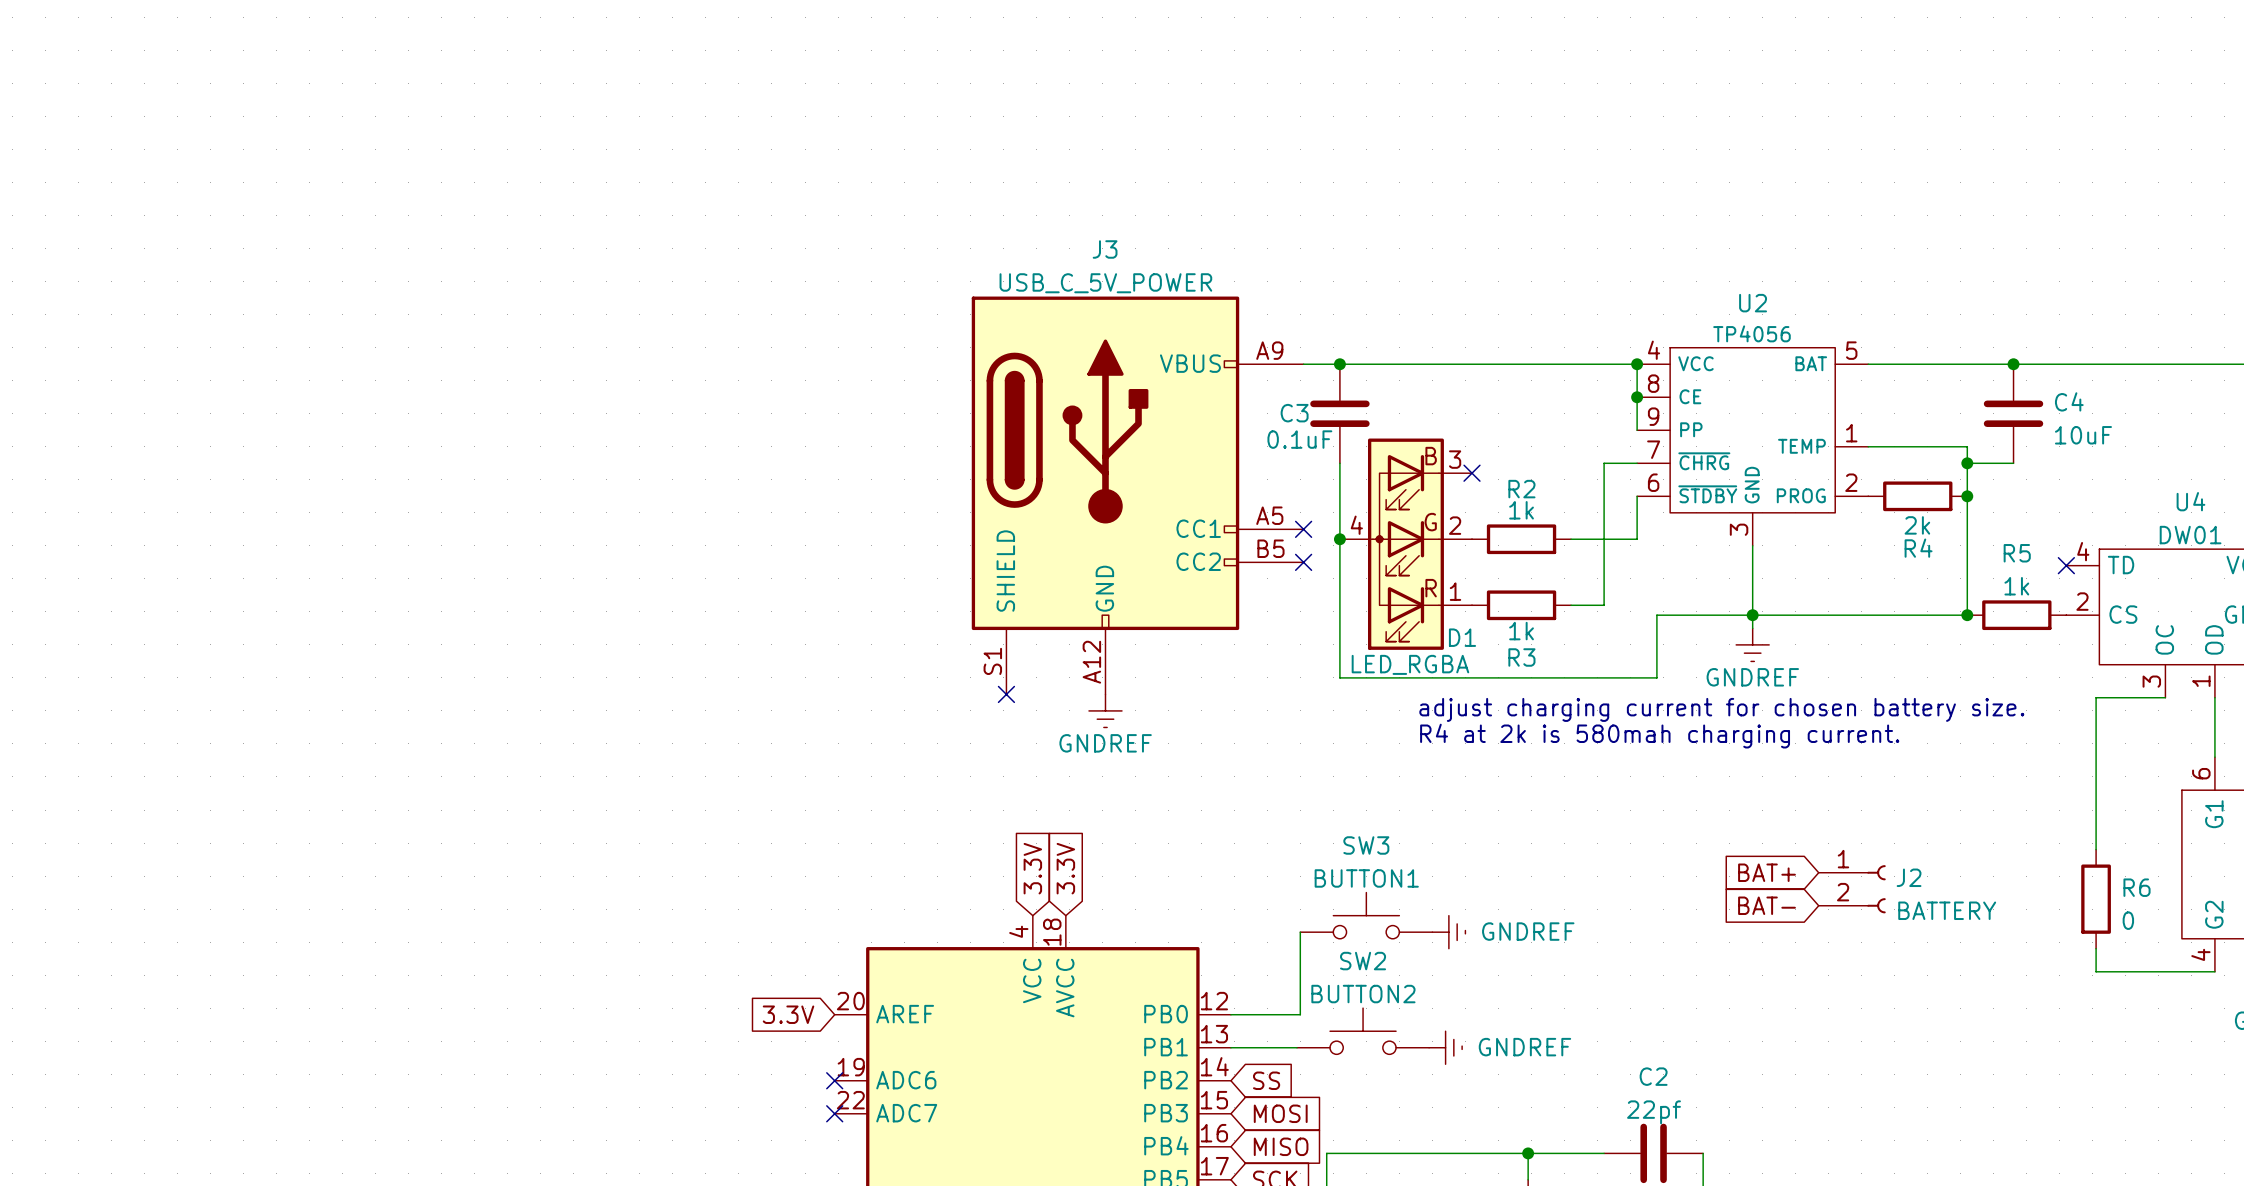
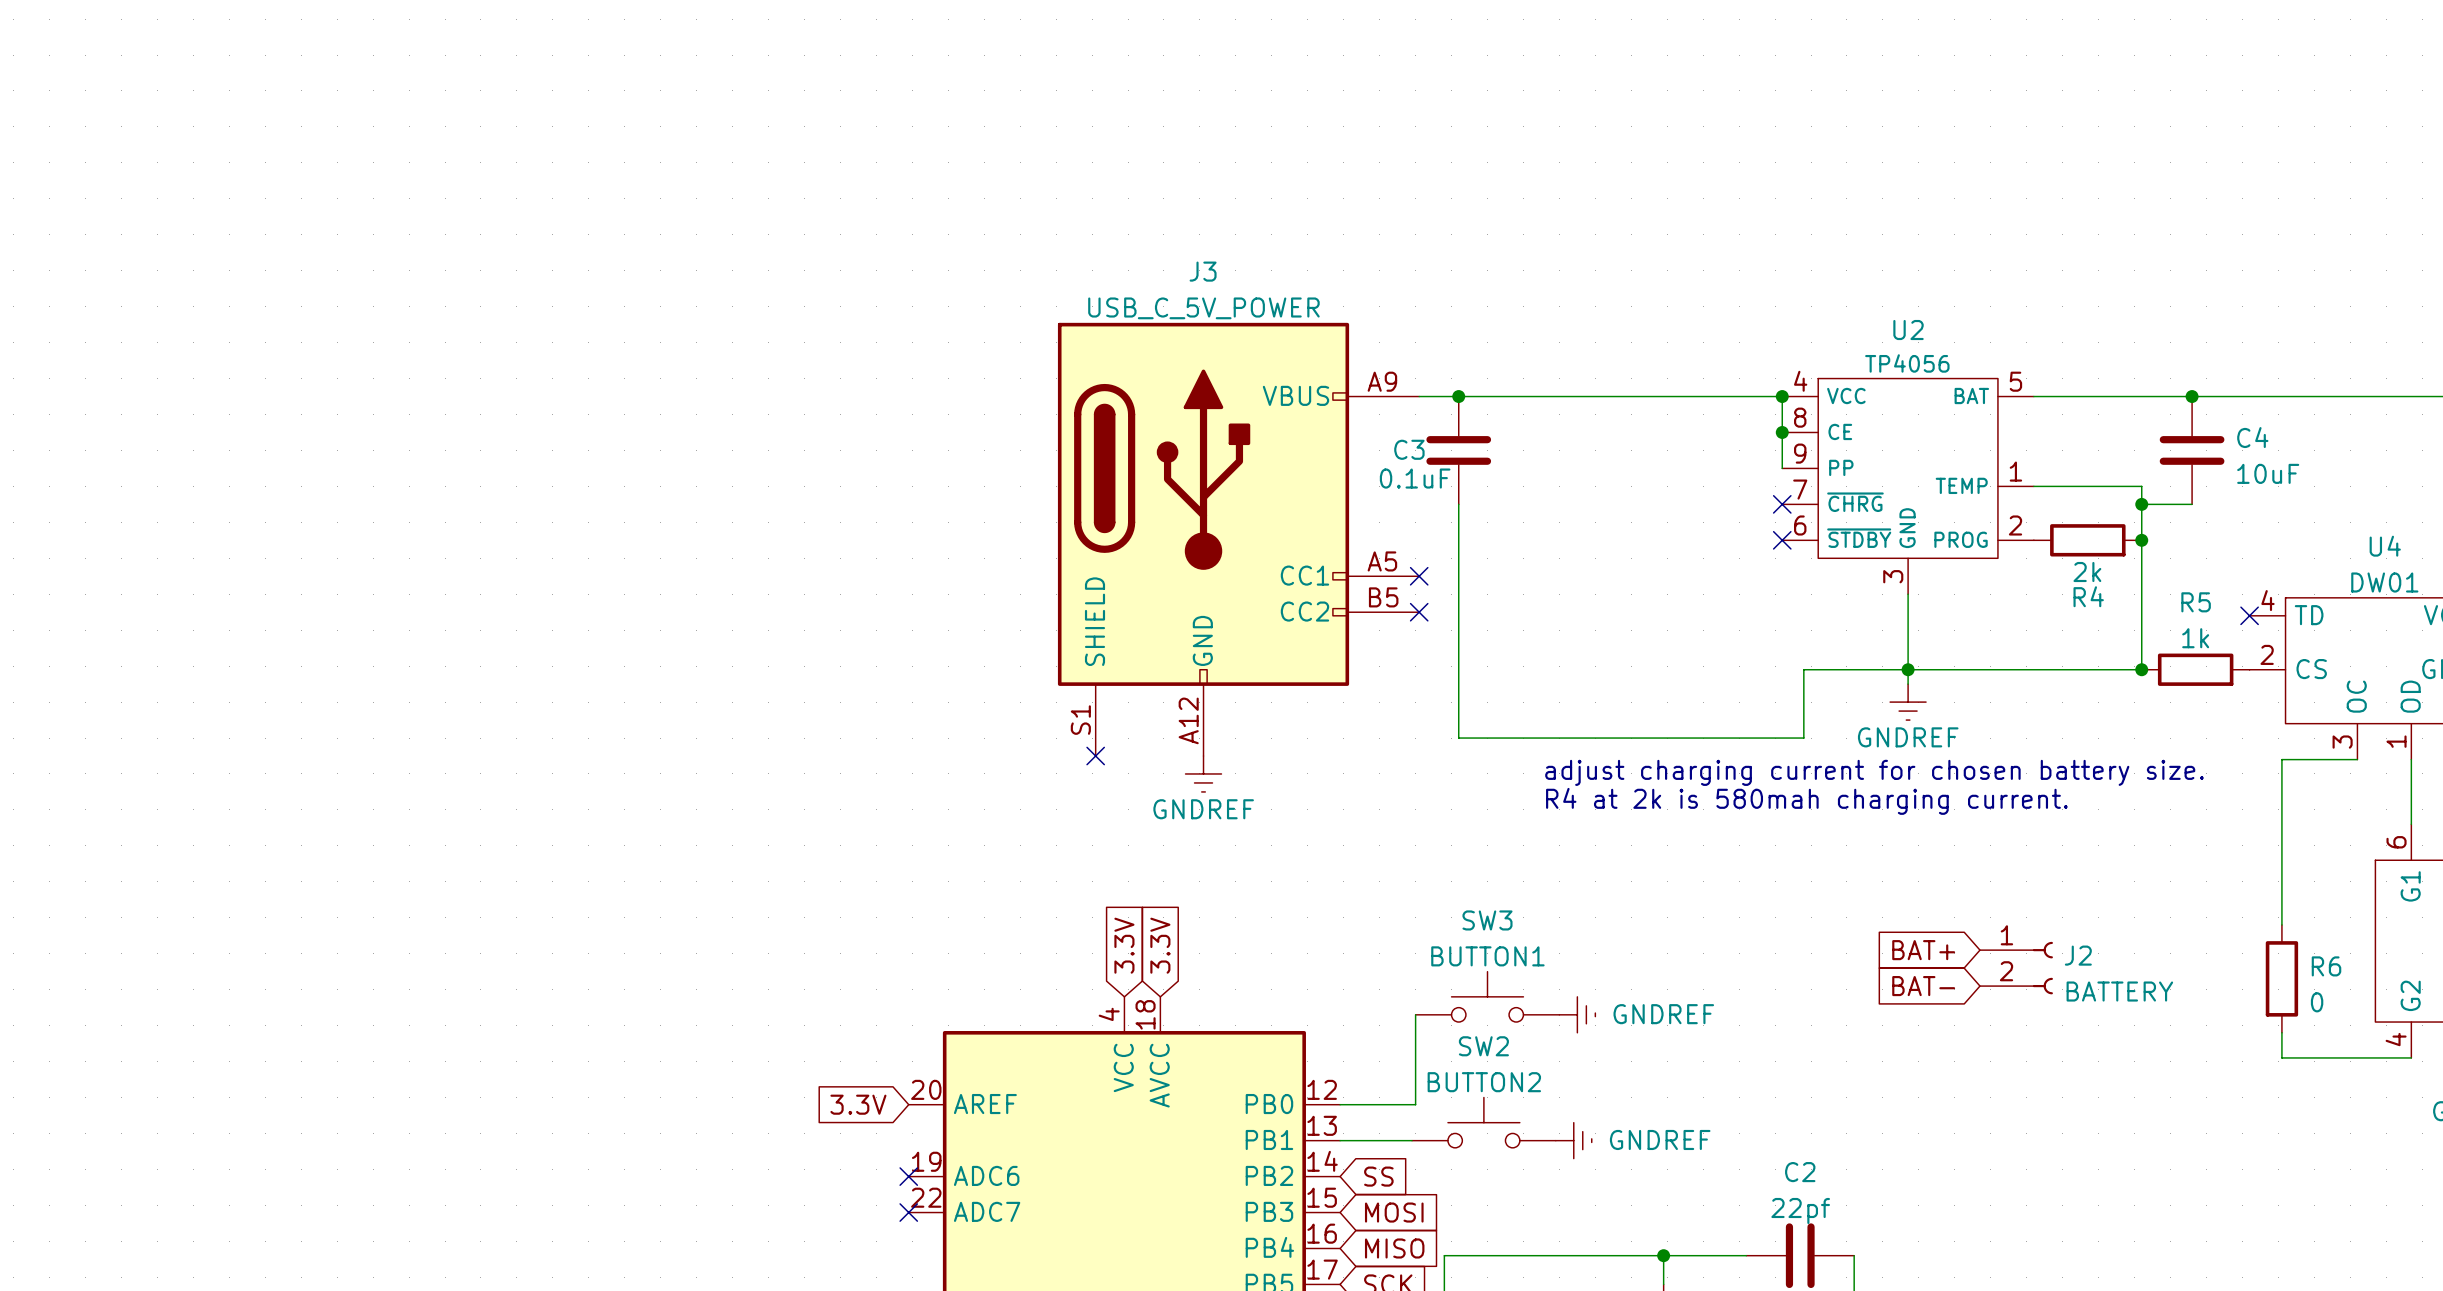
wire: (1637, 463) (1604, 463) (1604, 605) (1571, 605) -> none
no-connect mark: none -> (1782, 504)
no-connect mark: (1472, 473) -> none
wire: (1637, 496) (1637, 539) (1571, 539) -> none
no-connect mark: none -> (1782, 540)
junction: (1339, 539) -> none
R2: 1k (1521, 539) -> none
D1: LED_RGBA (1405, 544) -> none
R3: 1k (1521, 605) -> none

